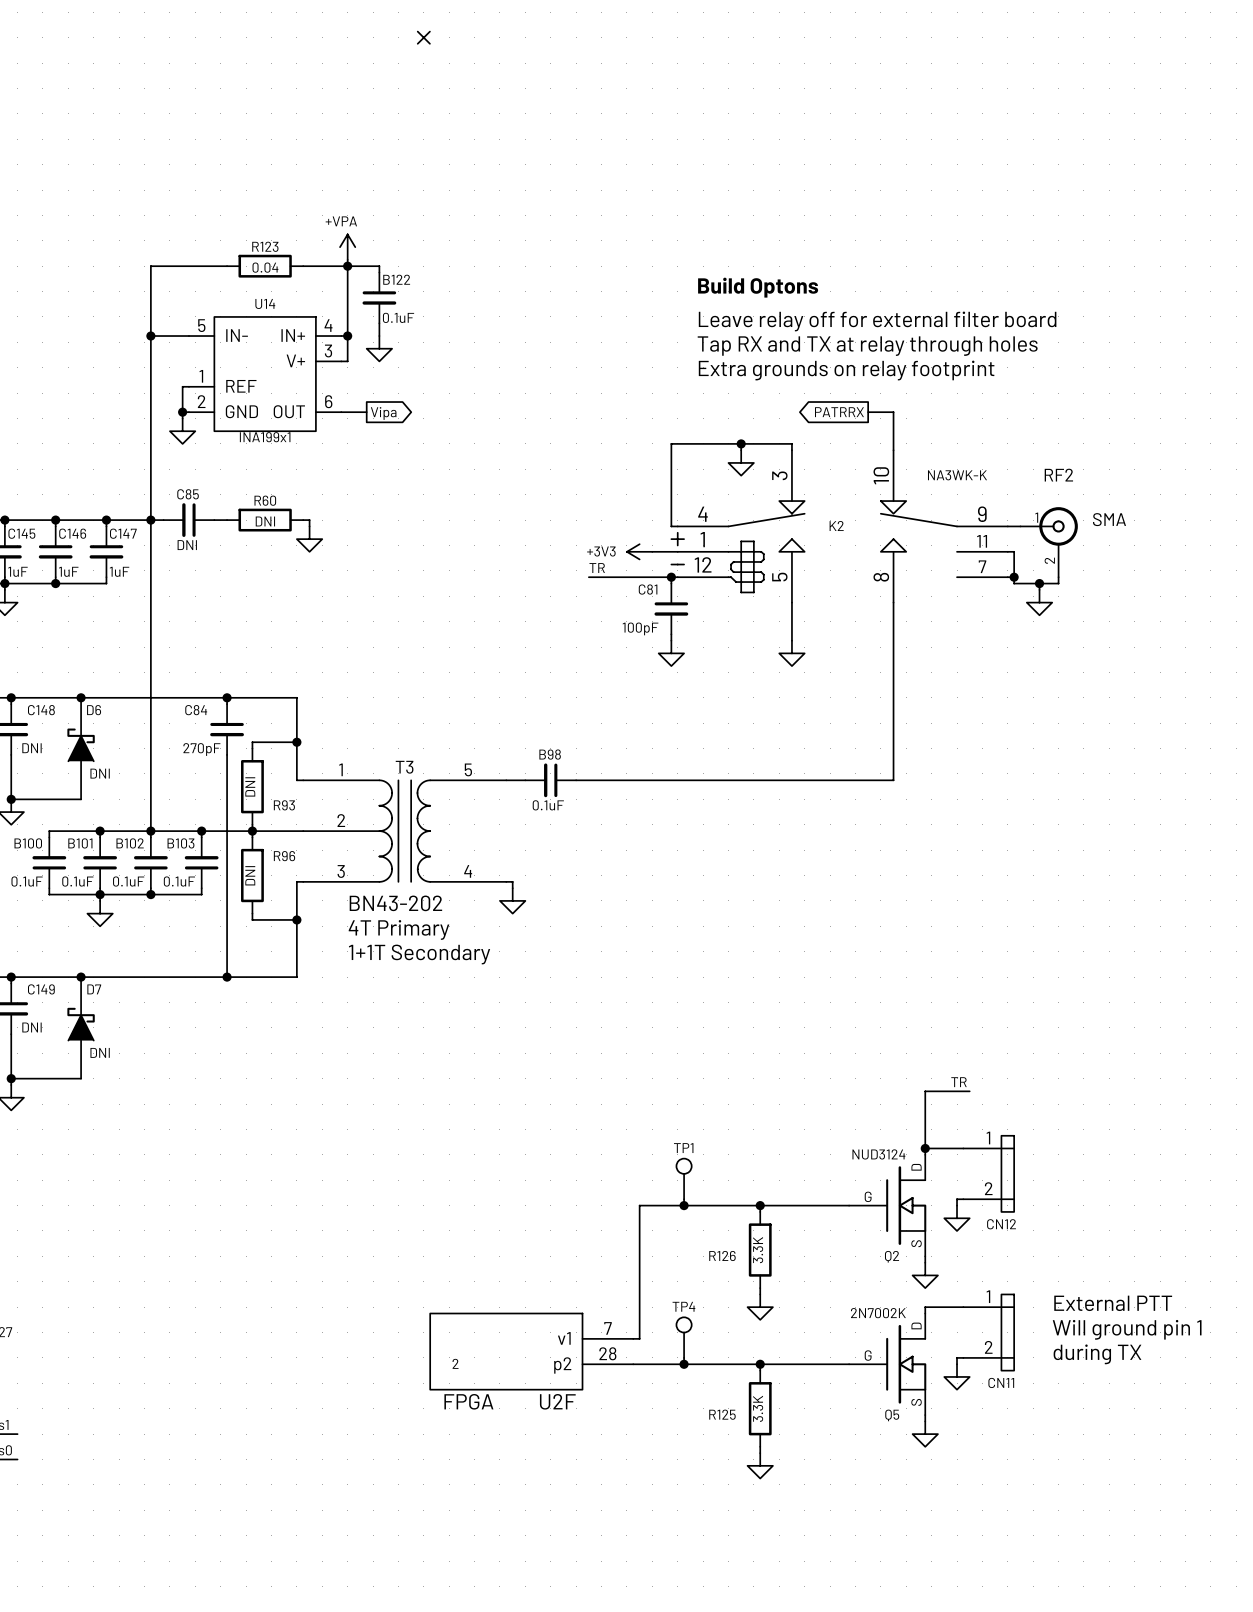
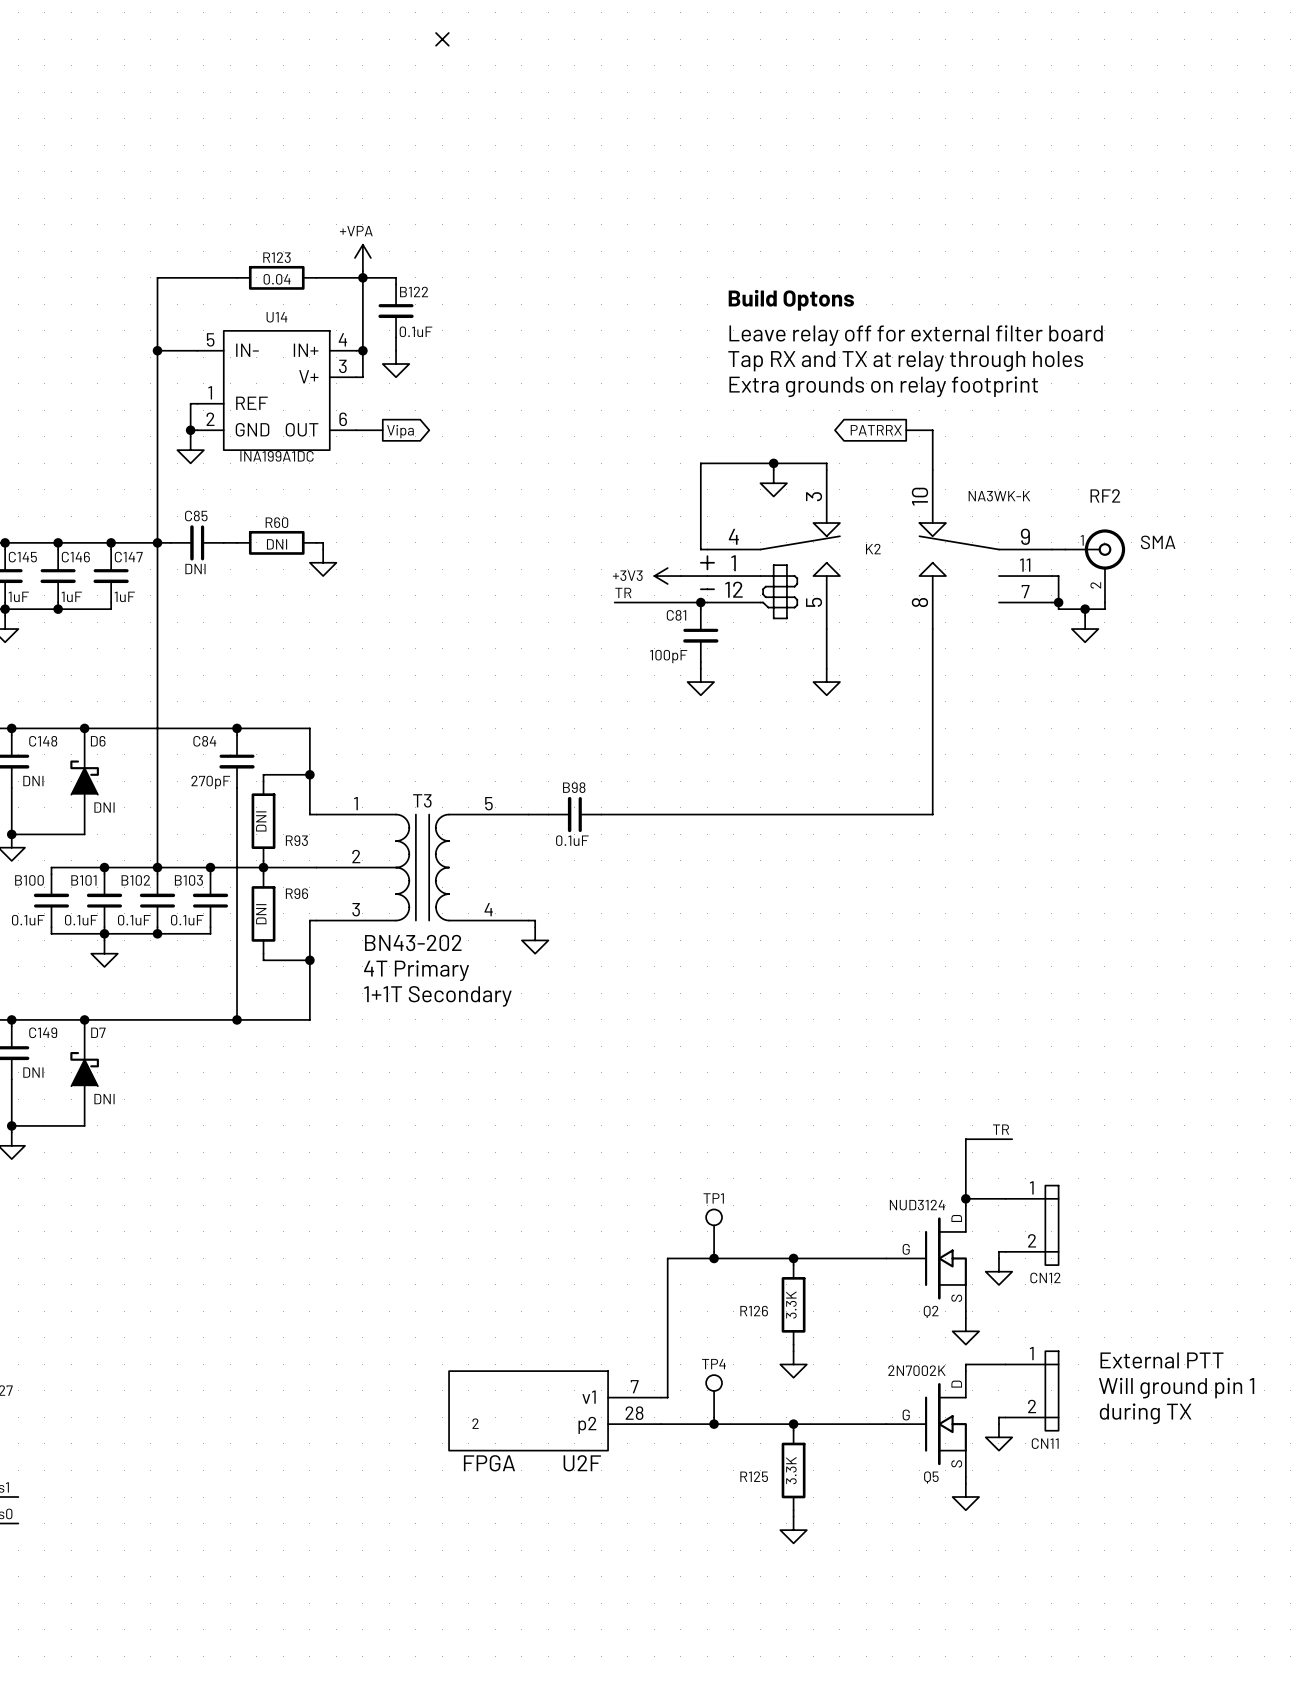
U14 value: INA199x1 (265, 437) -> INA199A1DC (276, 456)

